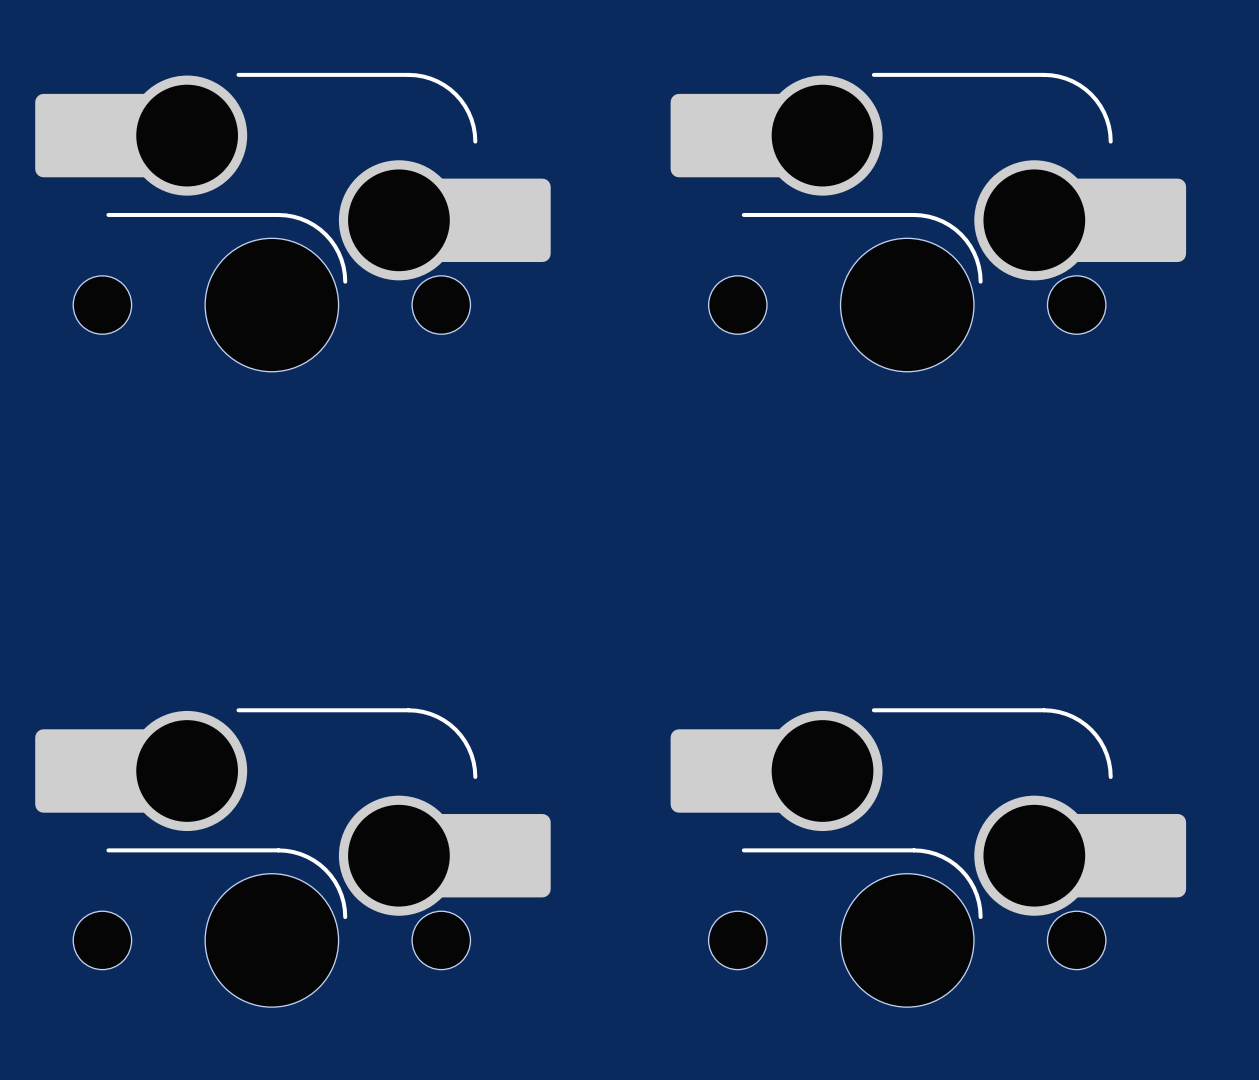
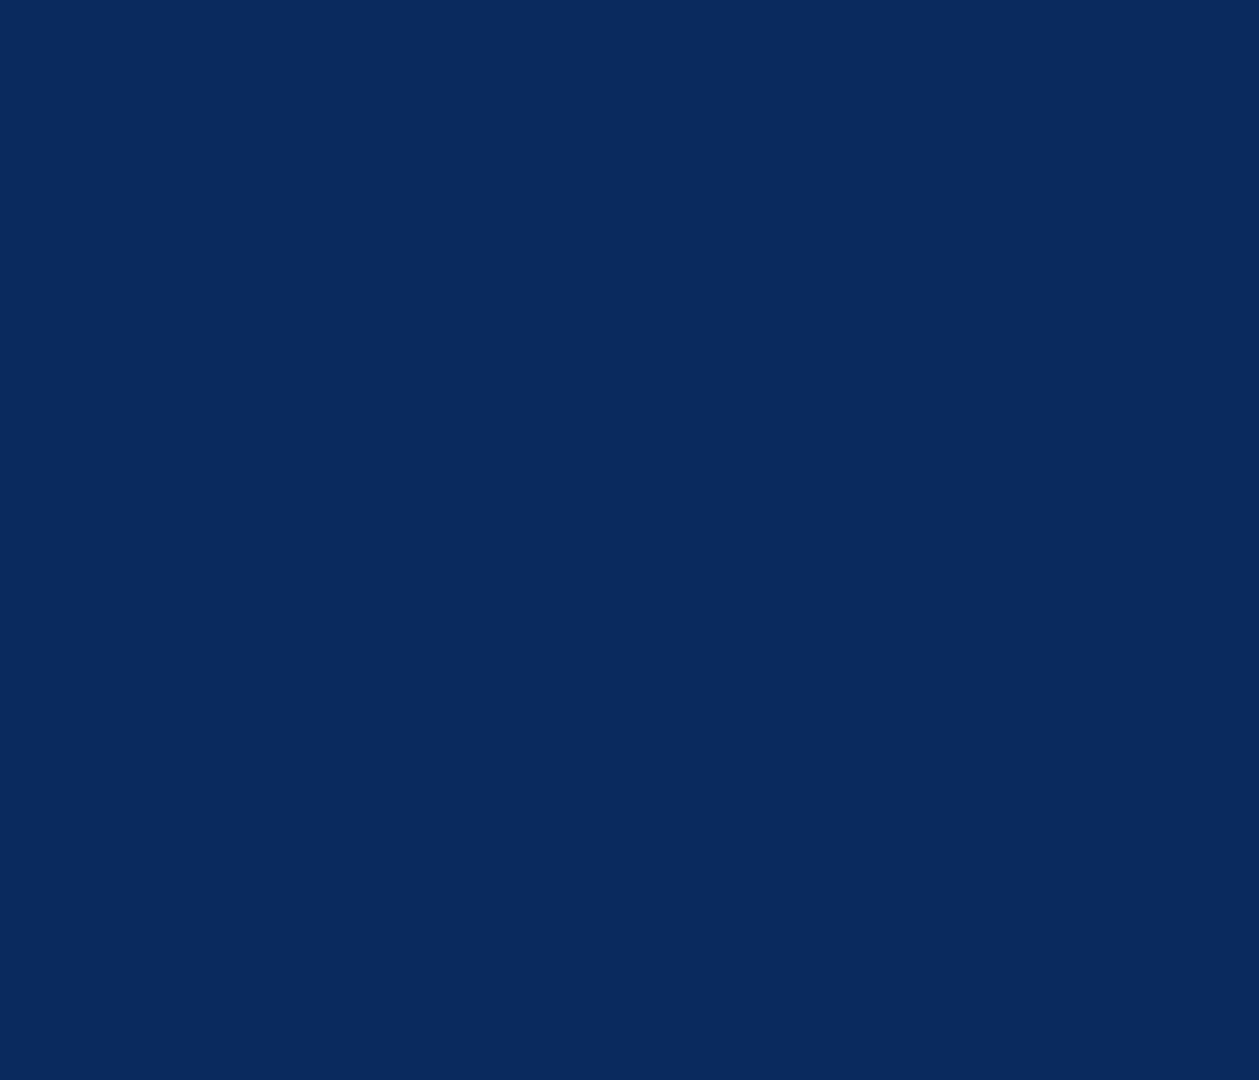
part: (292, 222) -> none
part: (928, 222) -> none
part: (292, 857) -> none
part: (928, 857) -> none

